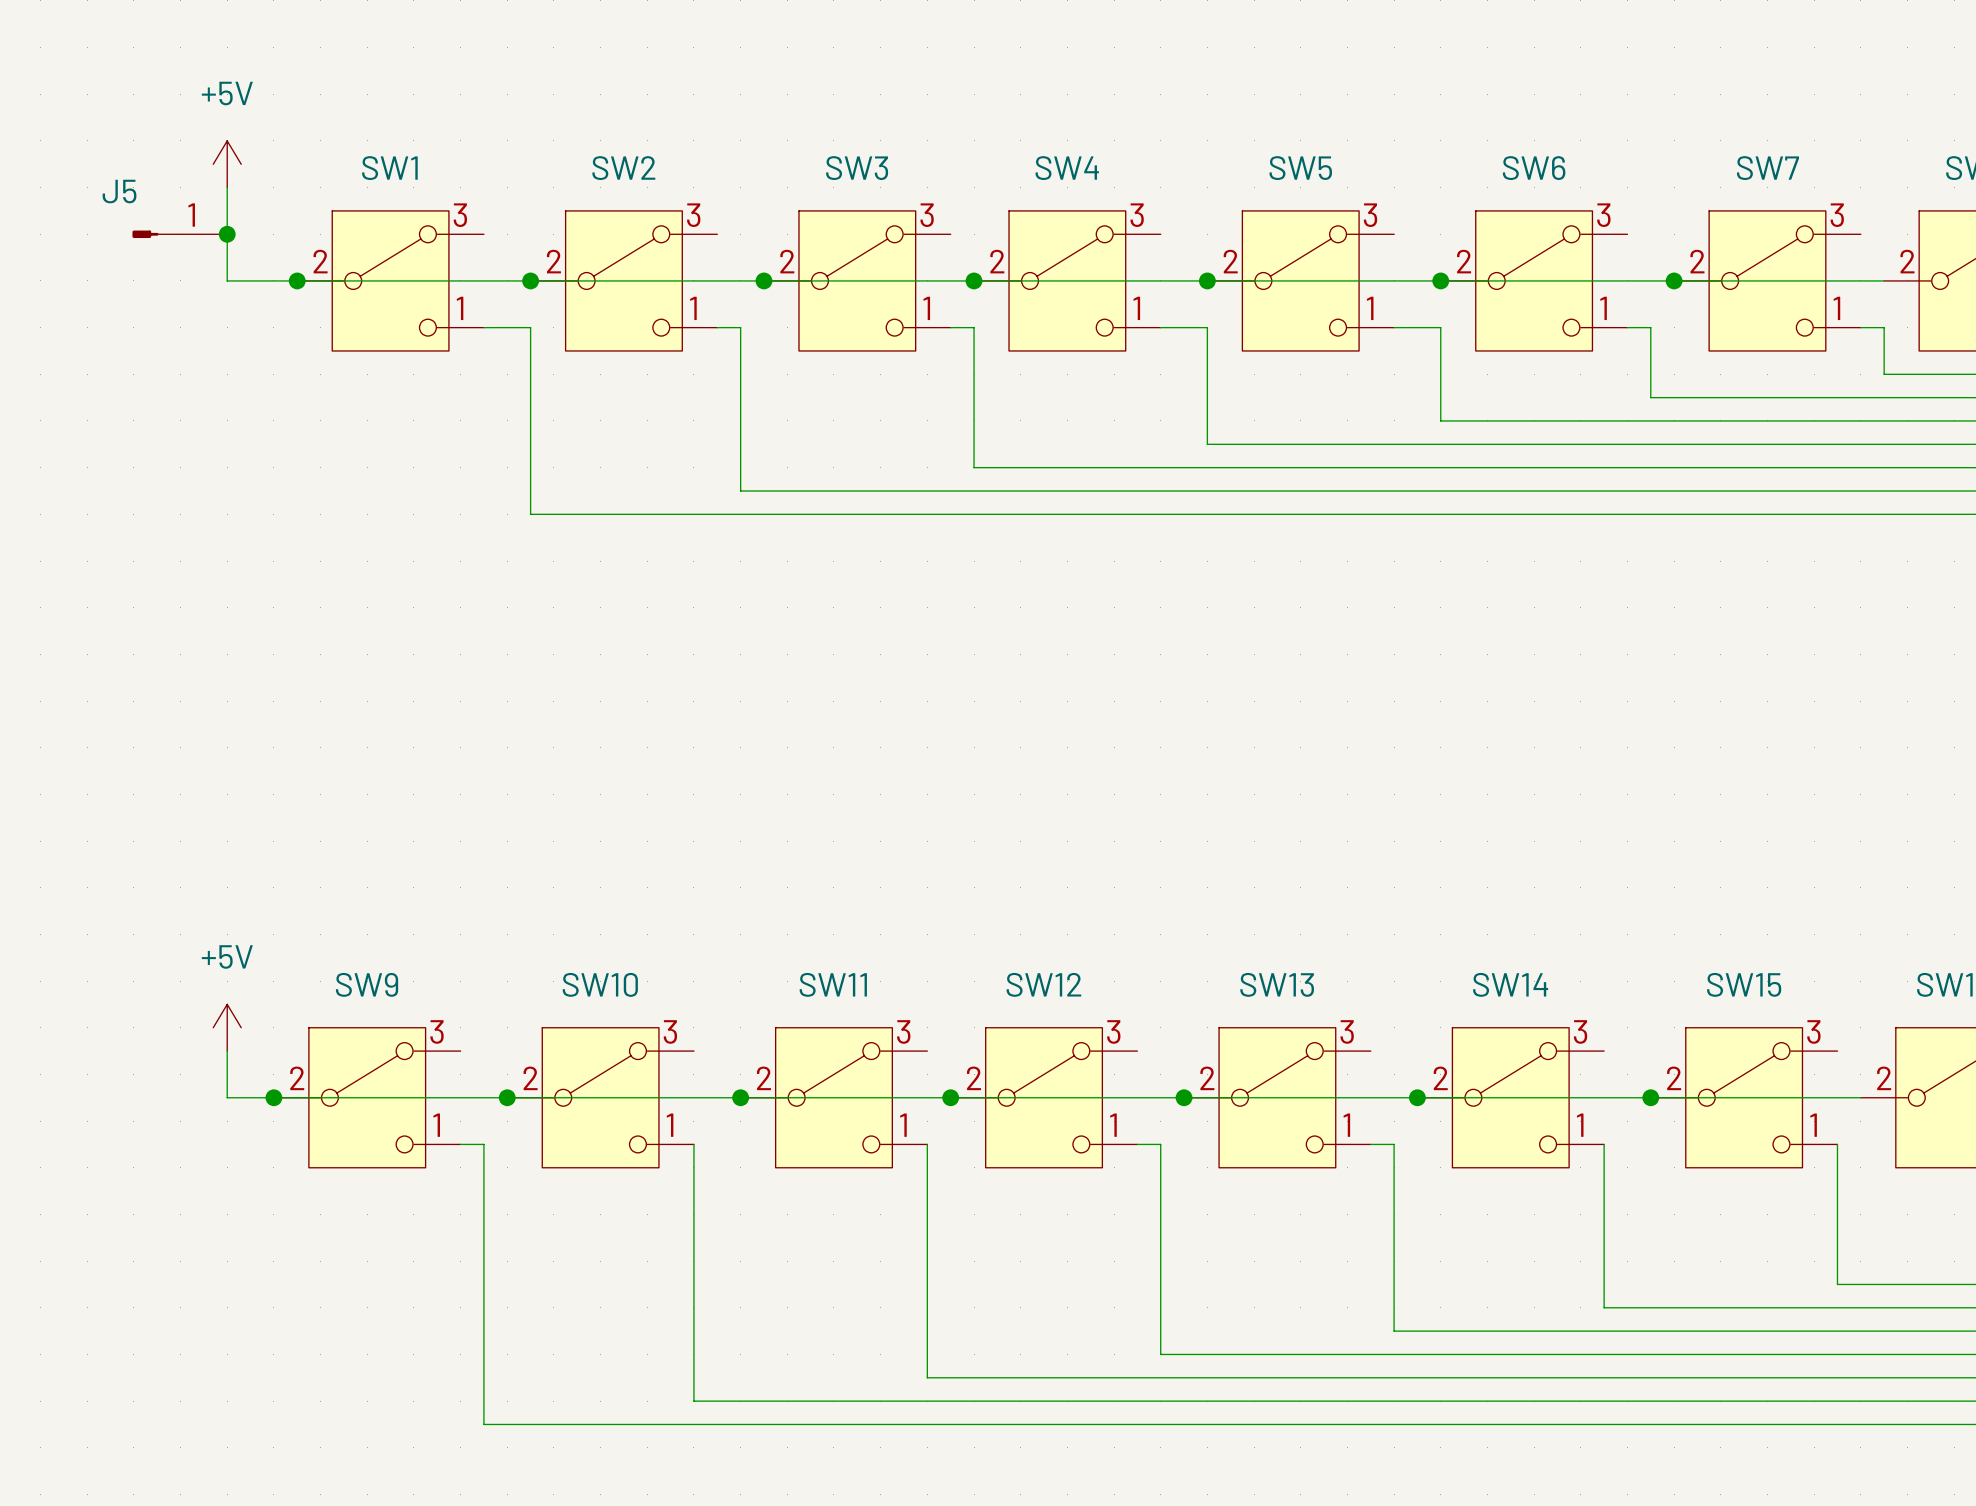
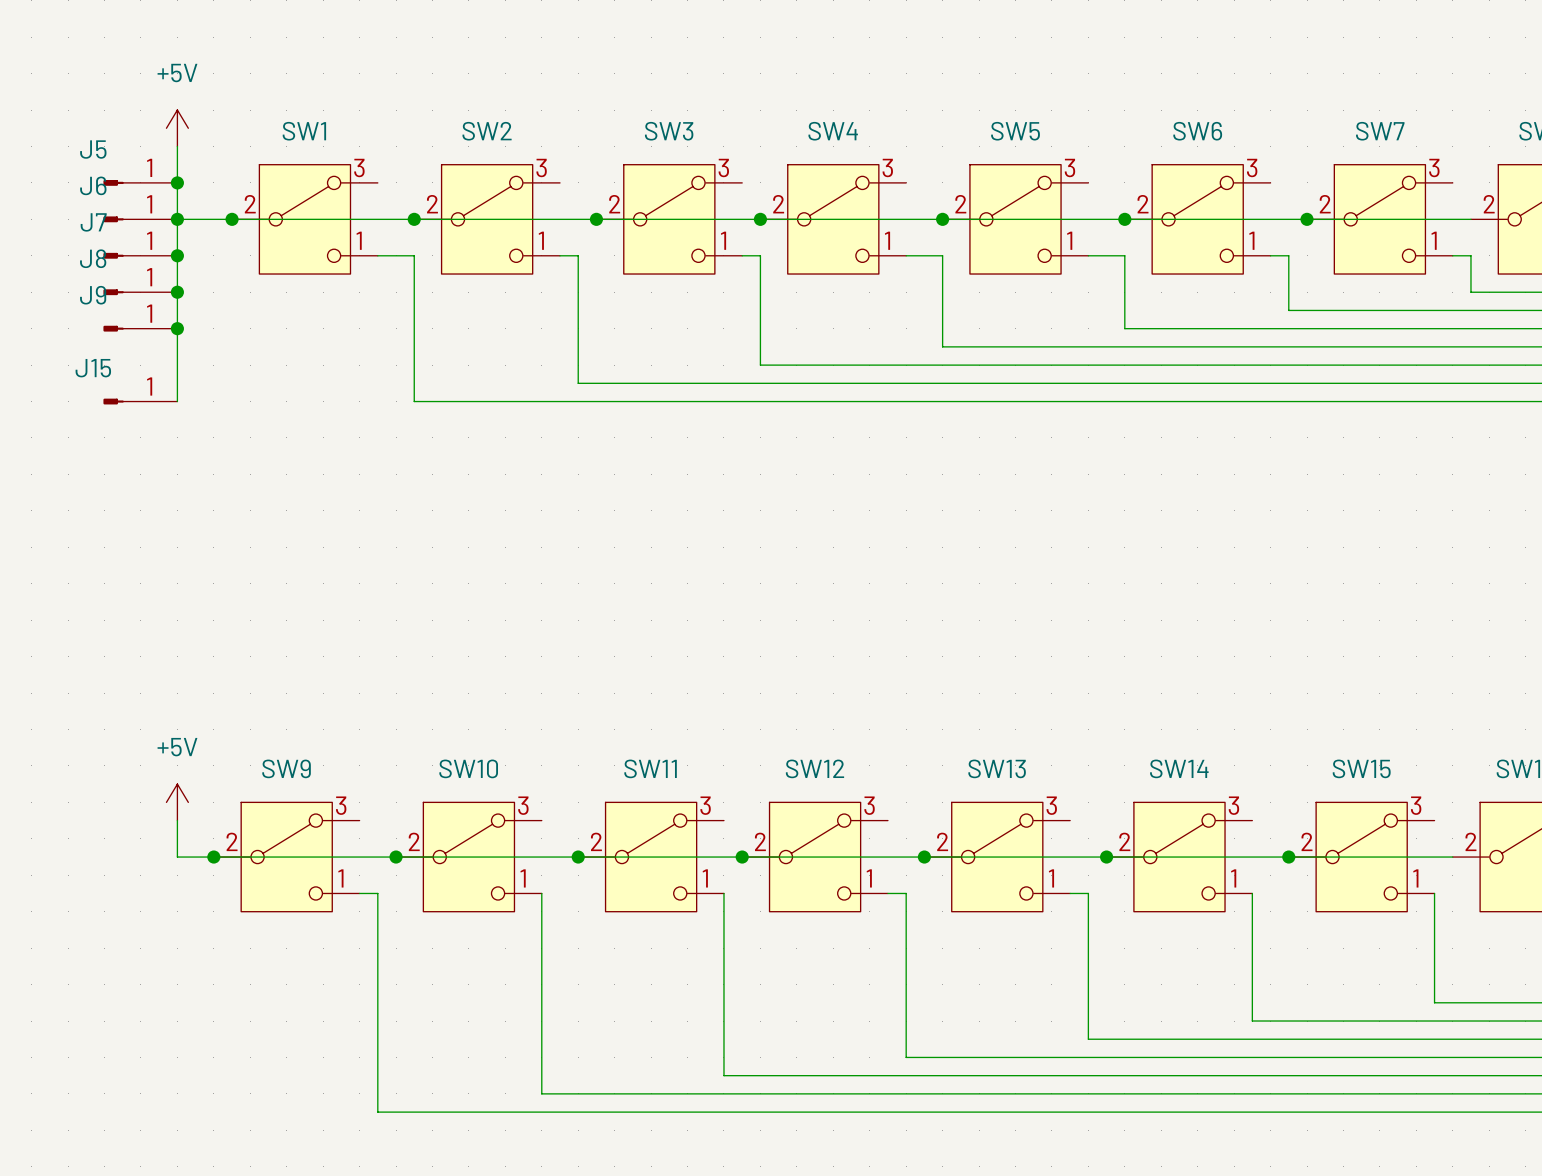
J6: none -> (140, 219)
wire: none -> (177, 219) (177, 401)
junction: none -> (177, 219)
J7: none -> (140, 255)
junction: none -> (177, 255)
J8: none -> (140, 292)
junction: none -> (177, 292)
J9: none -> (140, 328)
junction: none -> (177, 328)
J15: none -> (140, 401)

